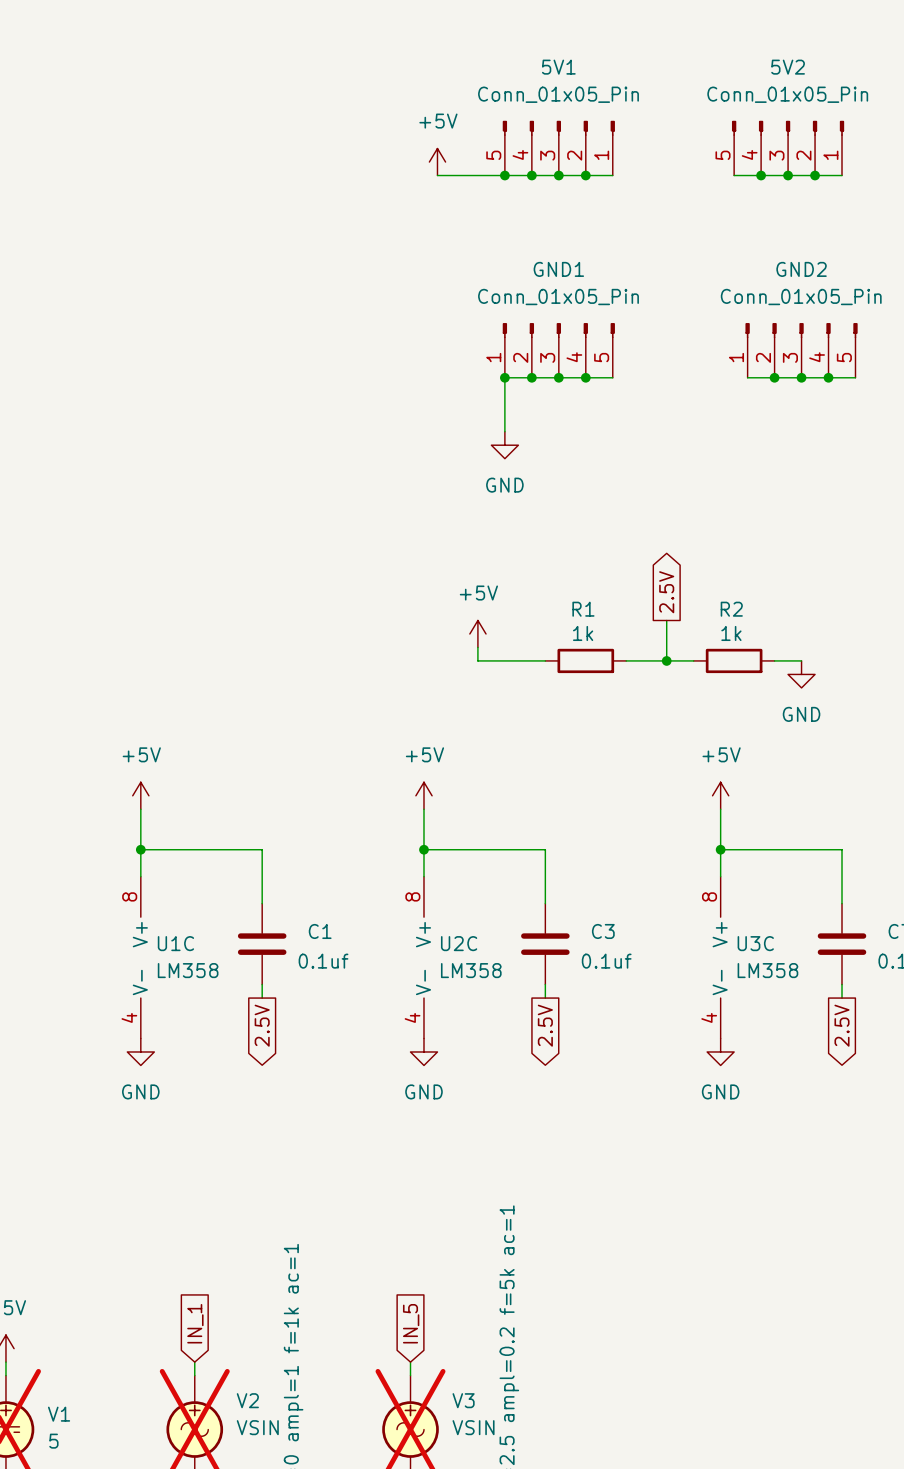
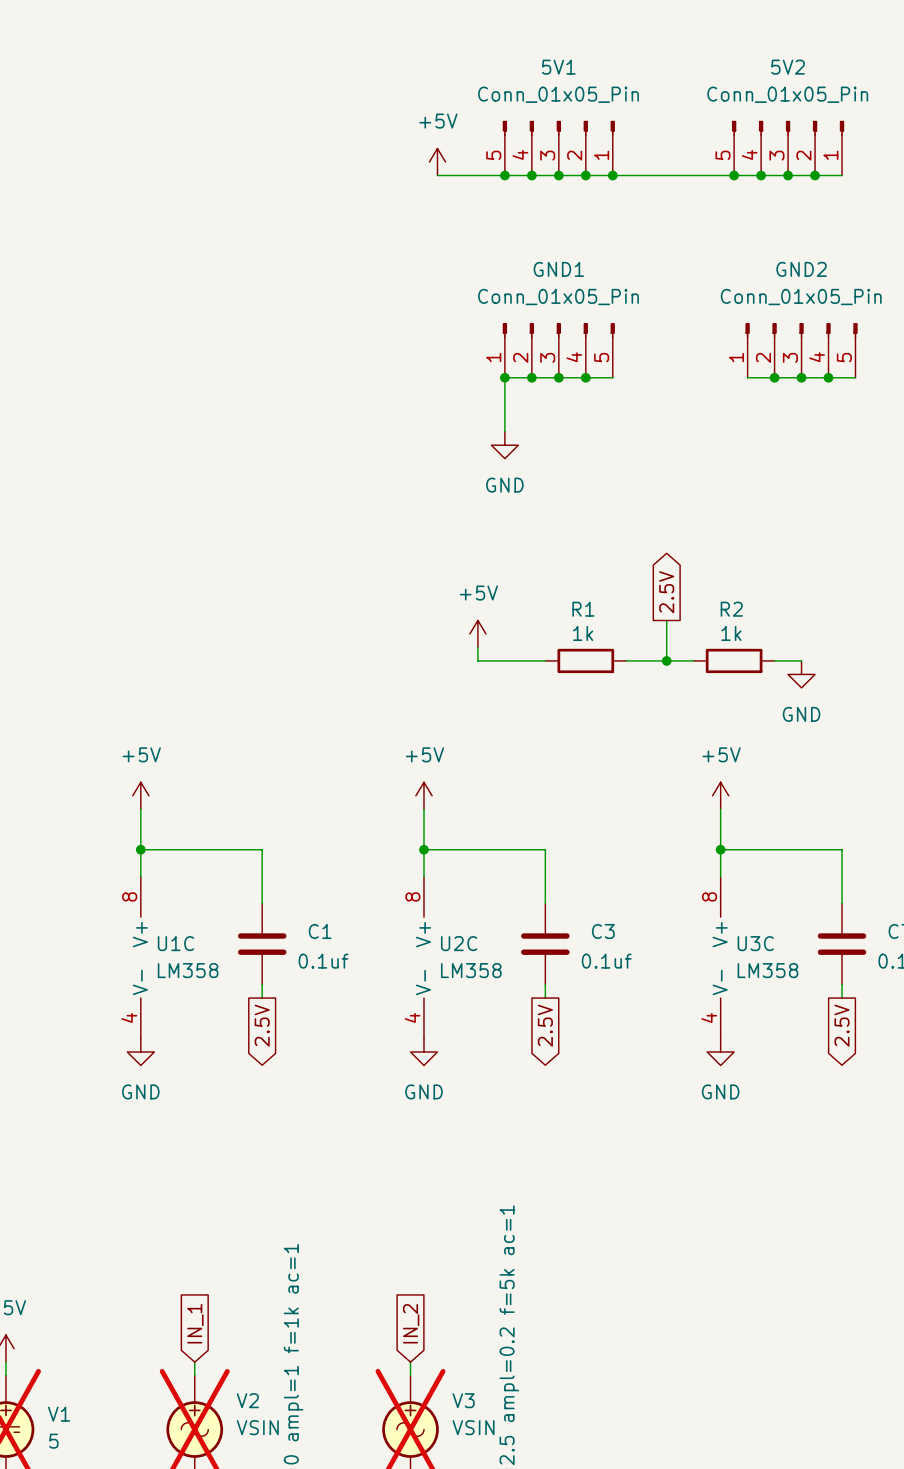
wire: none -> (612, 175) (734, 175)
junction: none -> (612, 175)
junction: none -> (734, 175)
global label: IN_5 (411, 1323) -> IN_2 (411, 1323)

